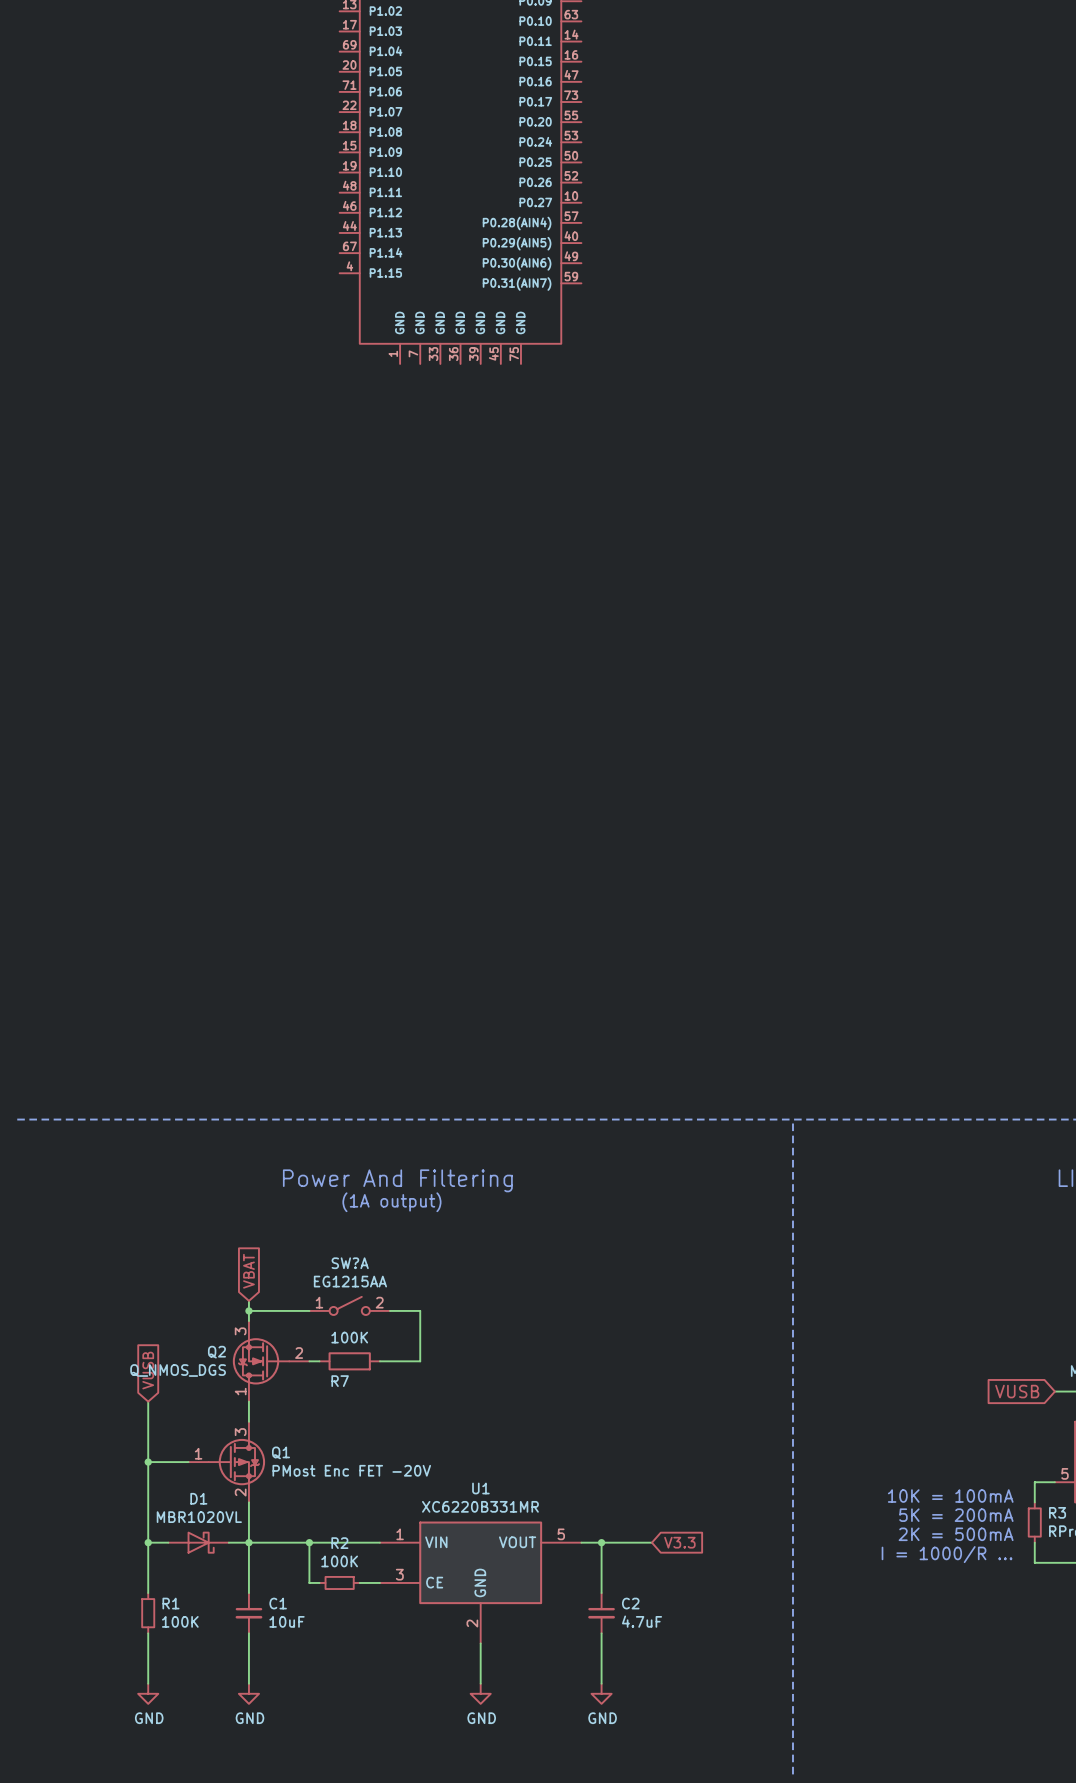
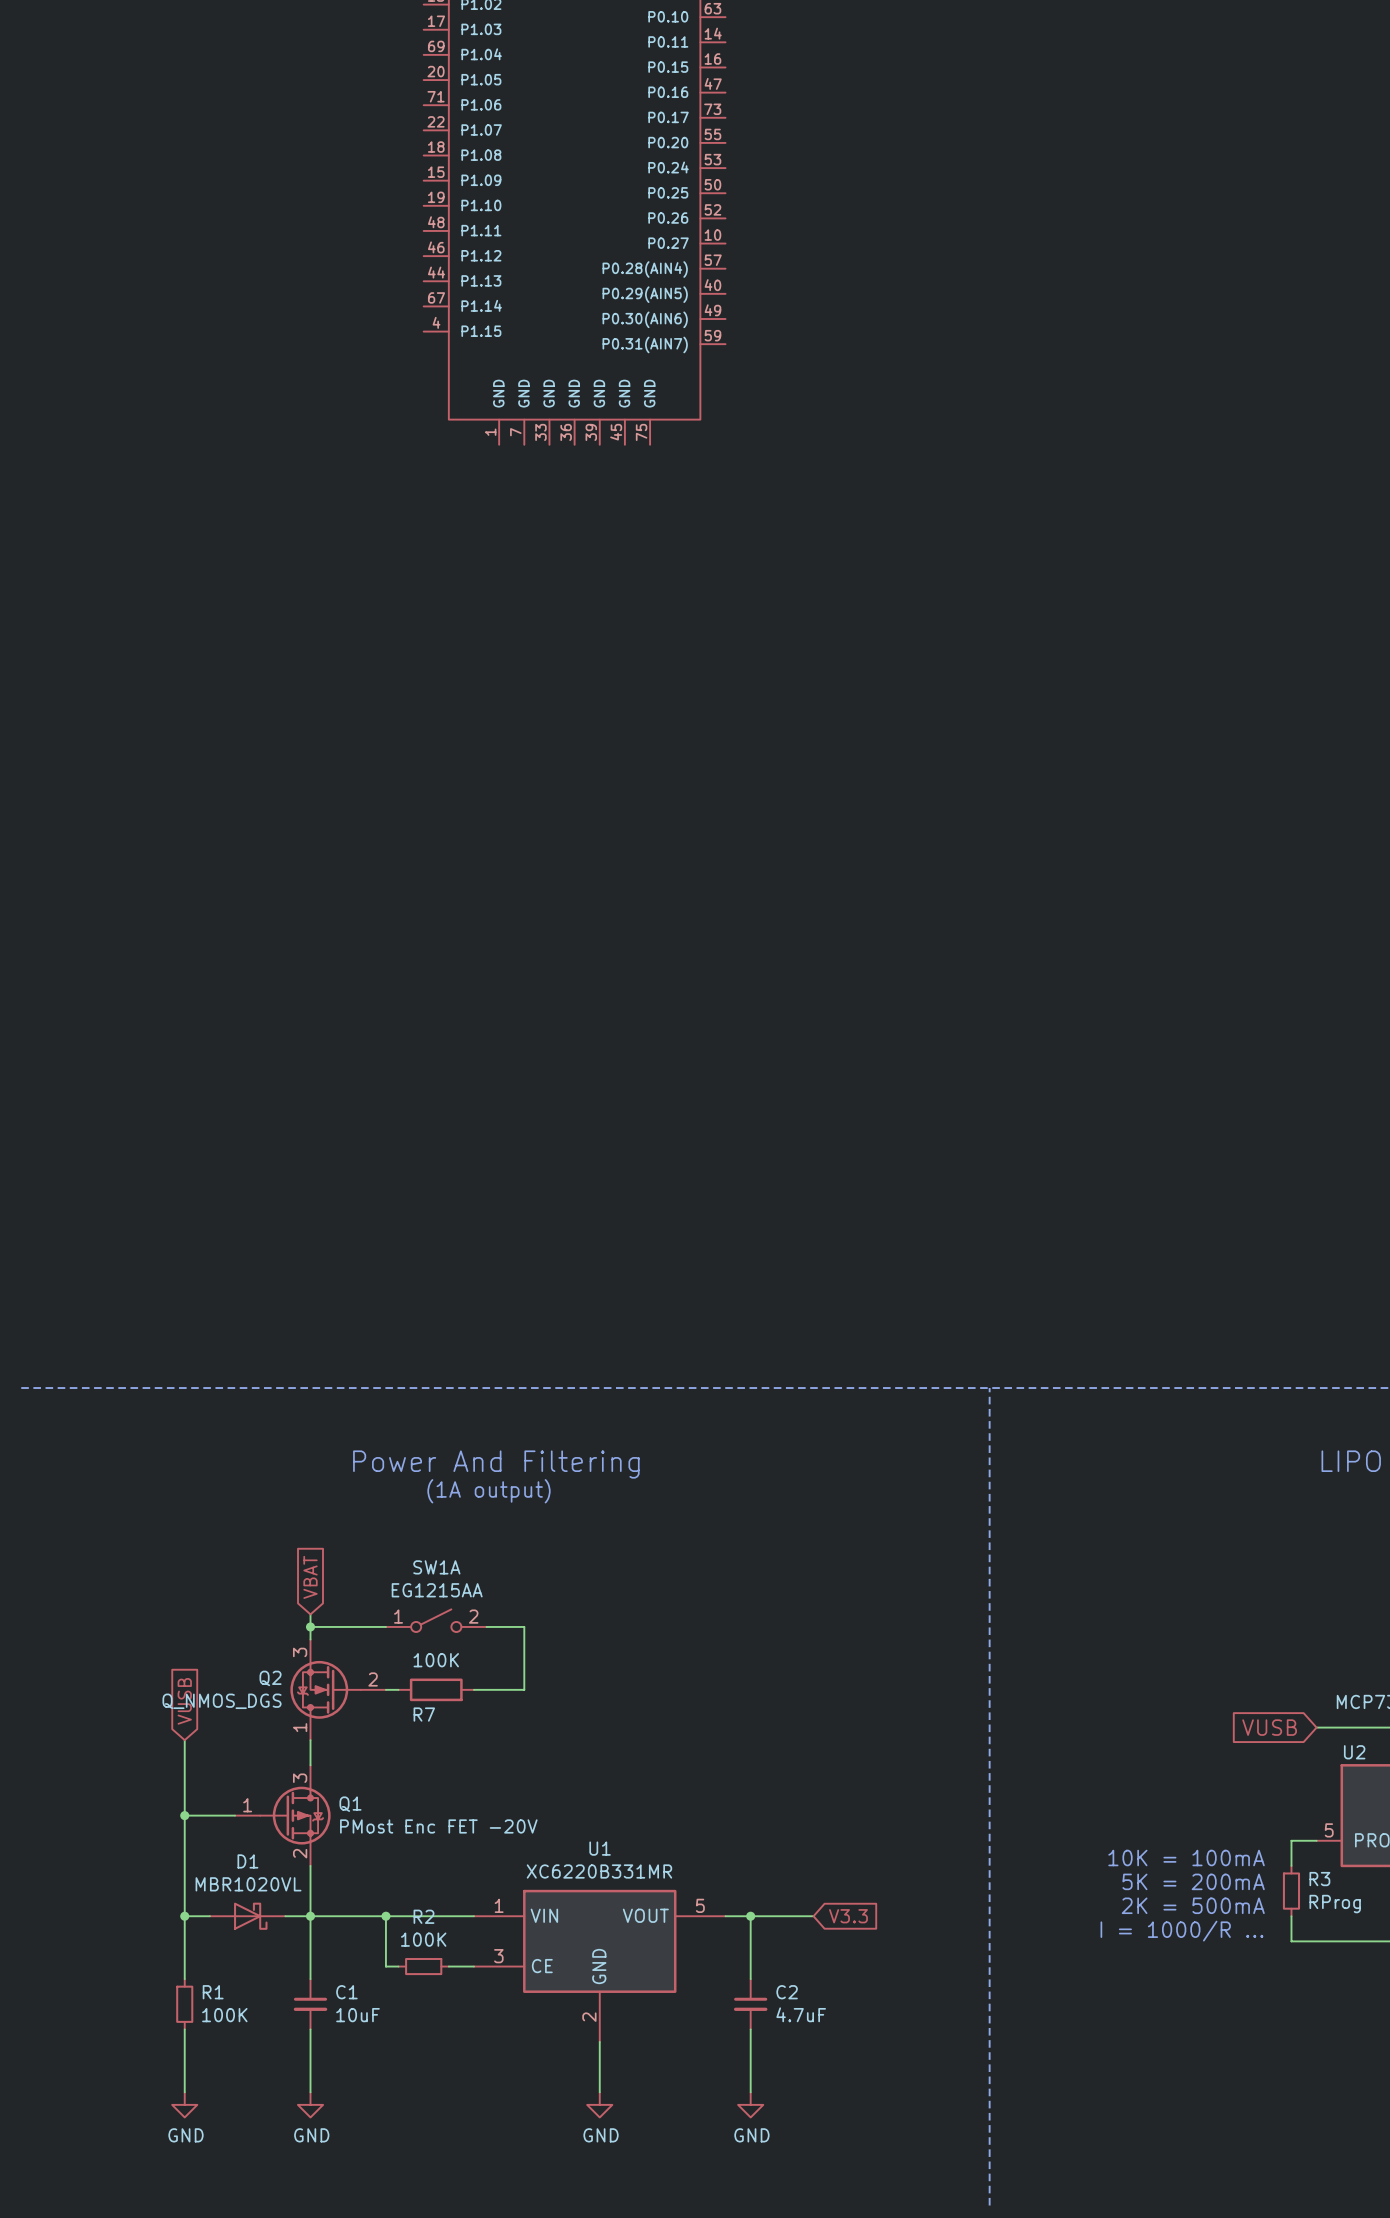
SW?A name: SW?A (350, 1263) -> SW1A (436, 1567)

